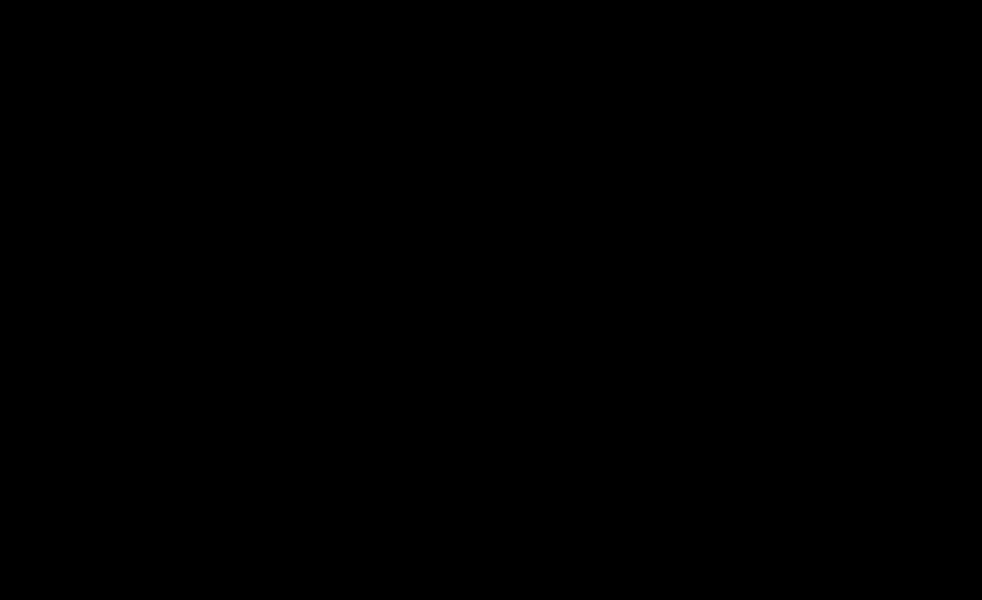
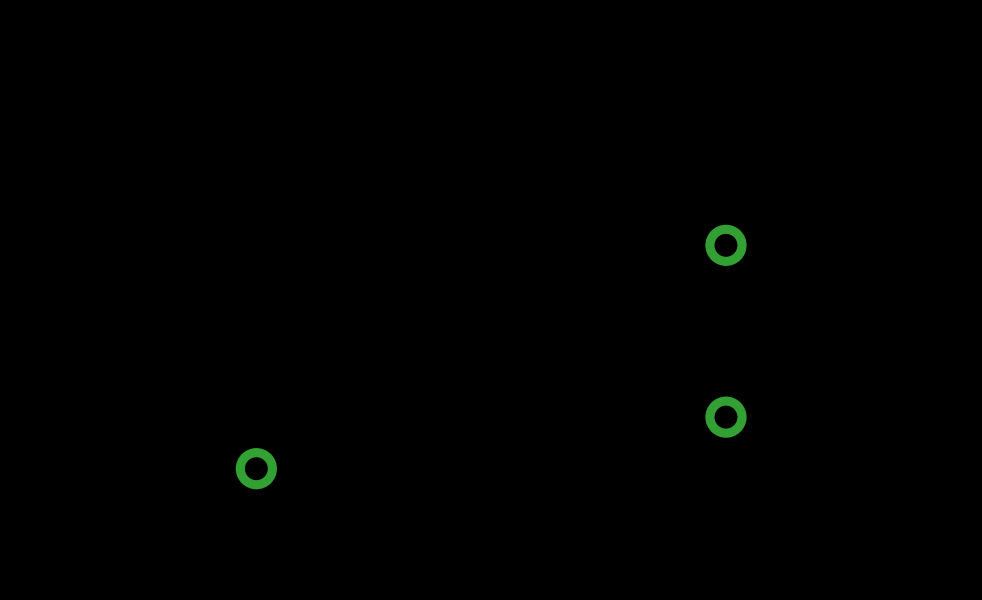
via: none -> (725, 245)
via: none -> (725, 417)
via: none -> (256, 468)

